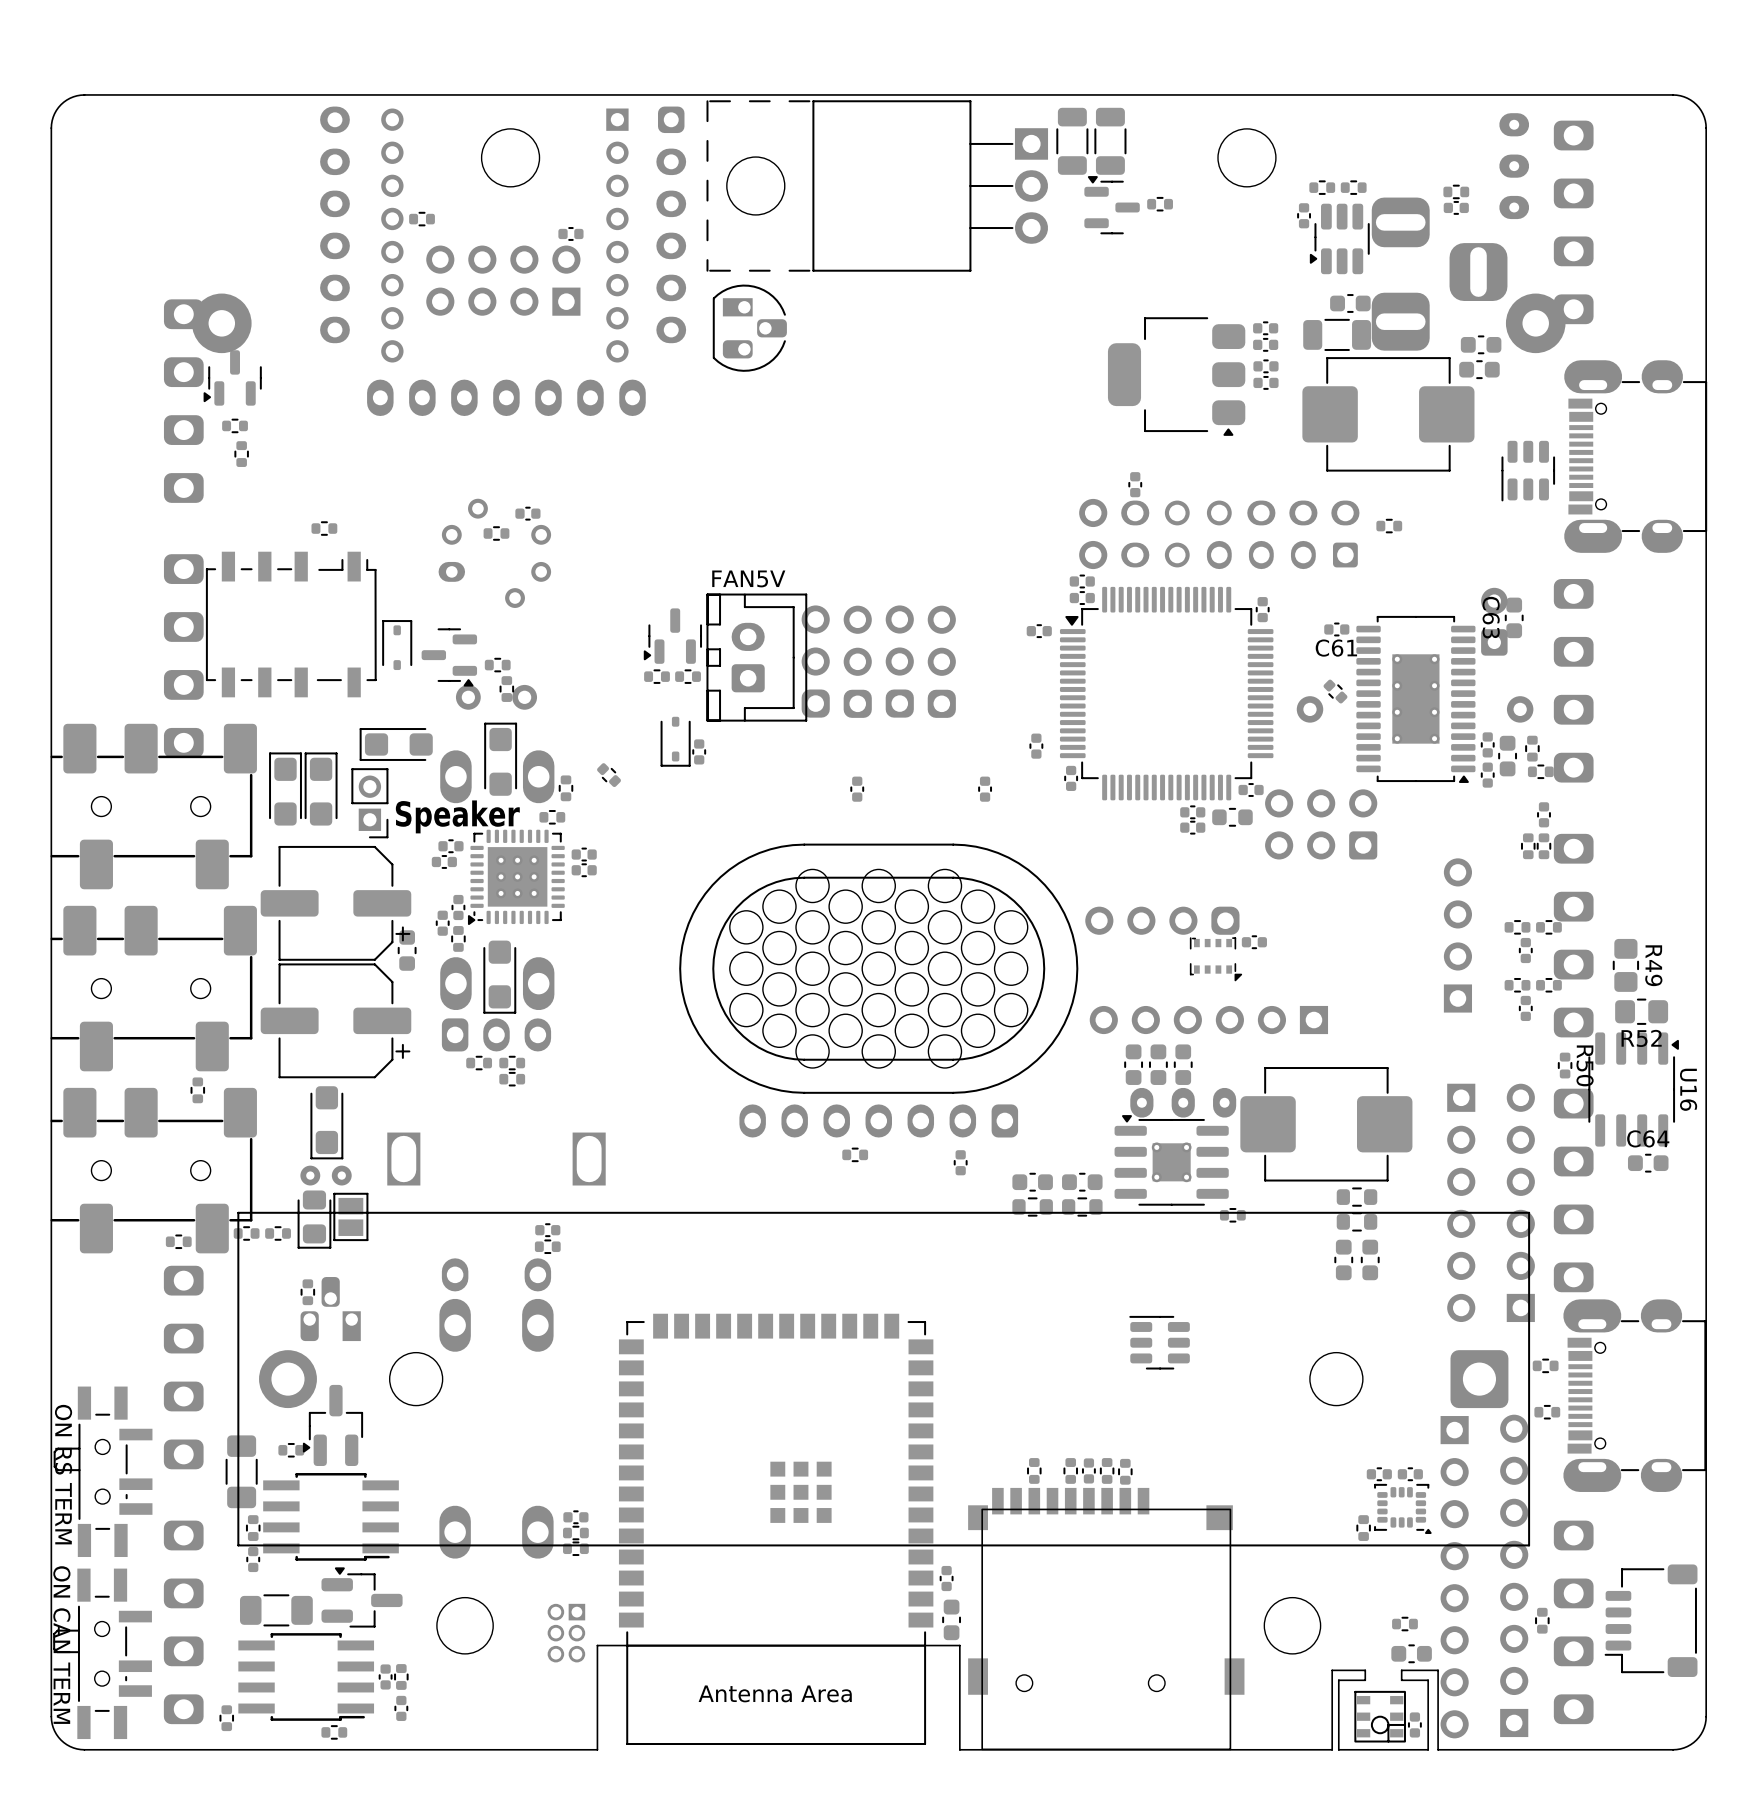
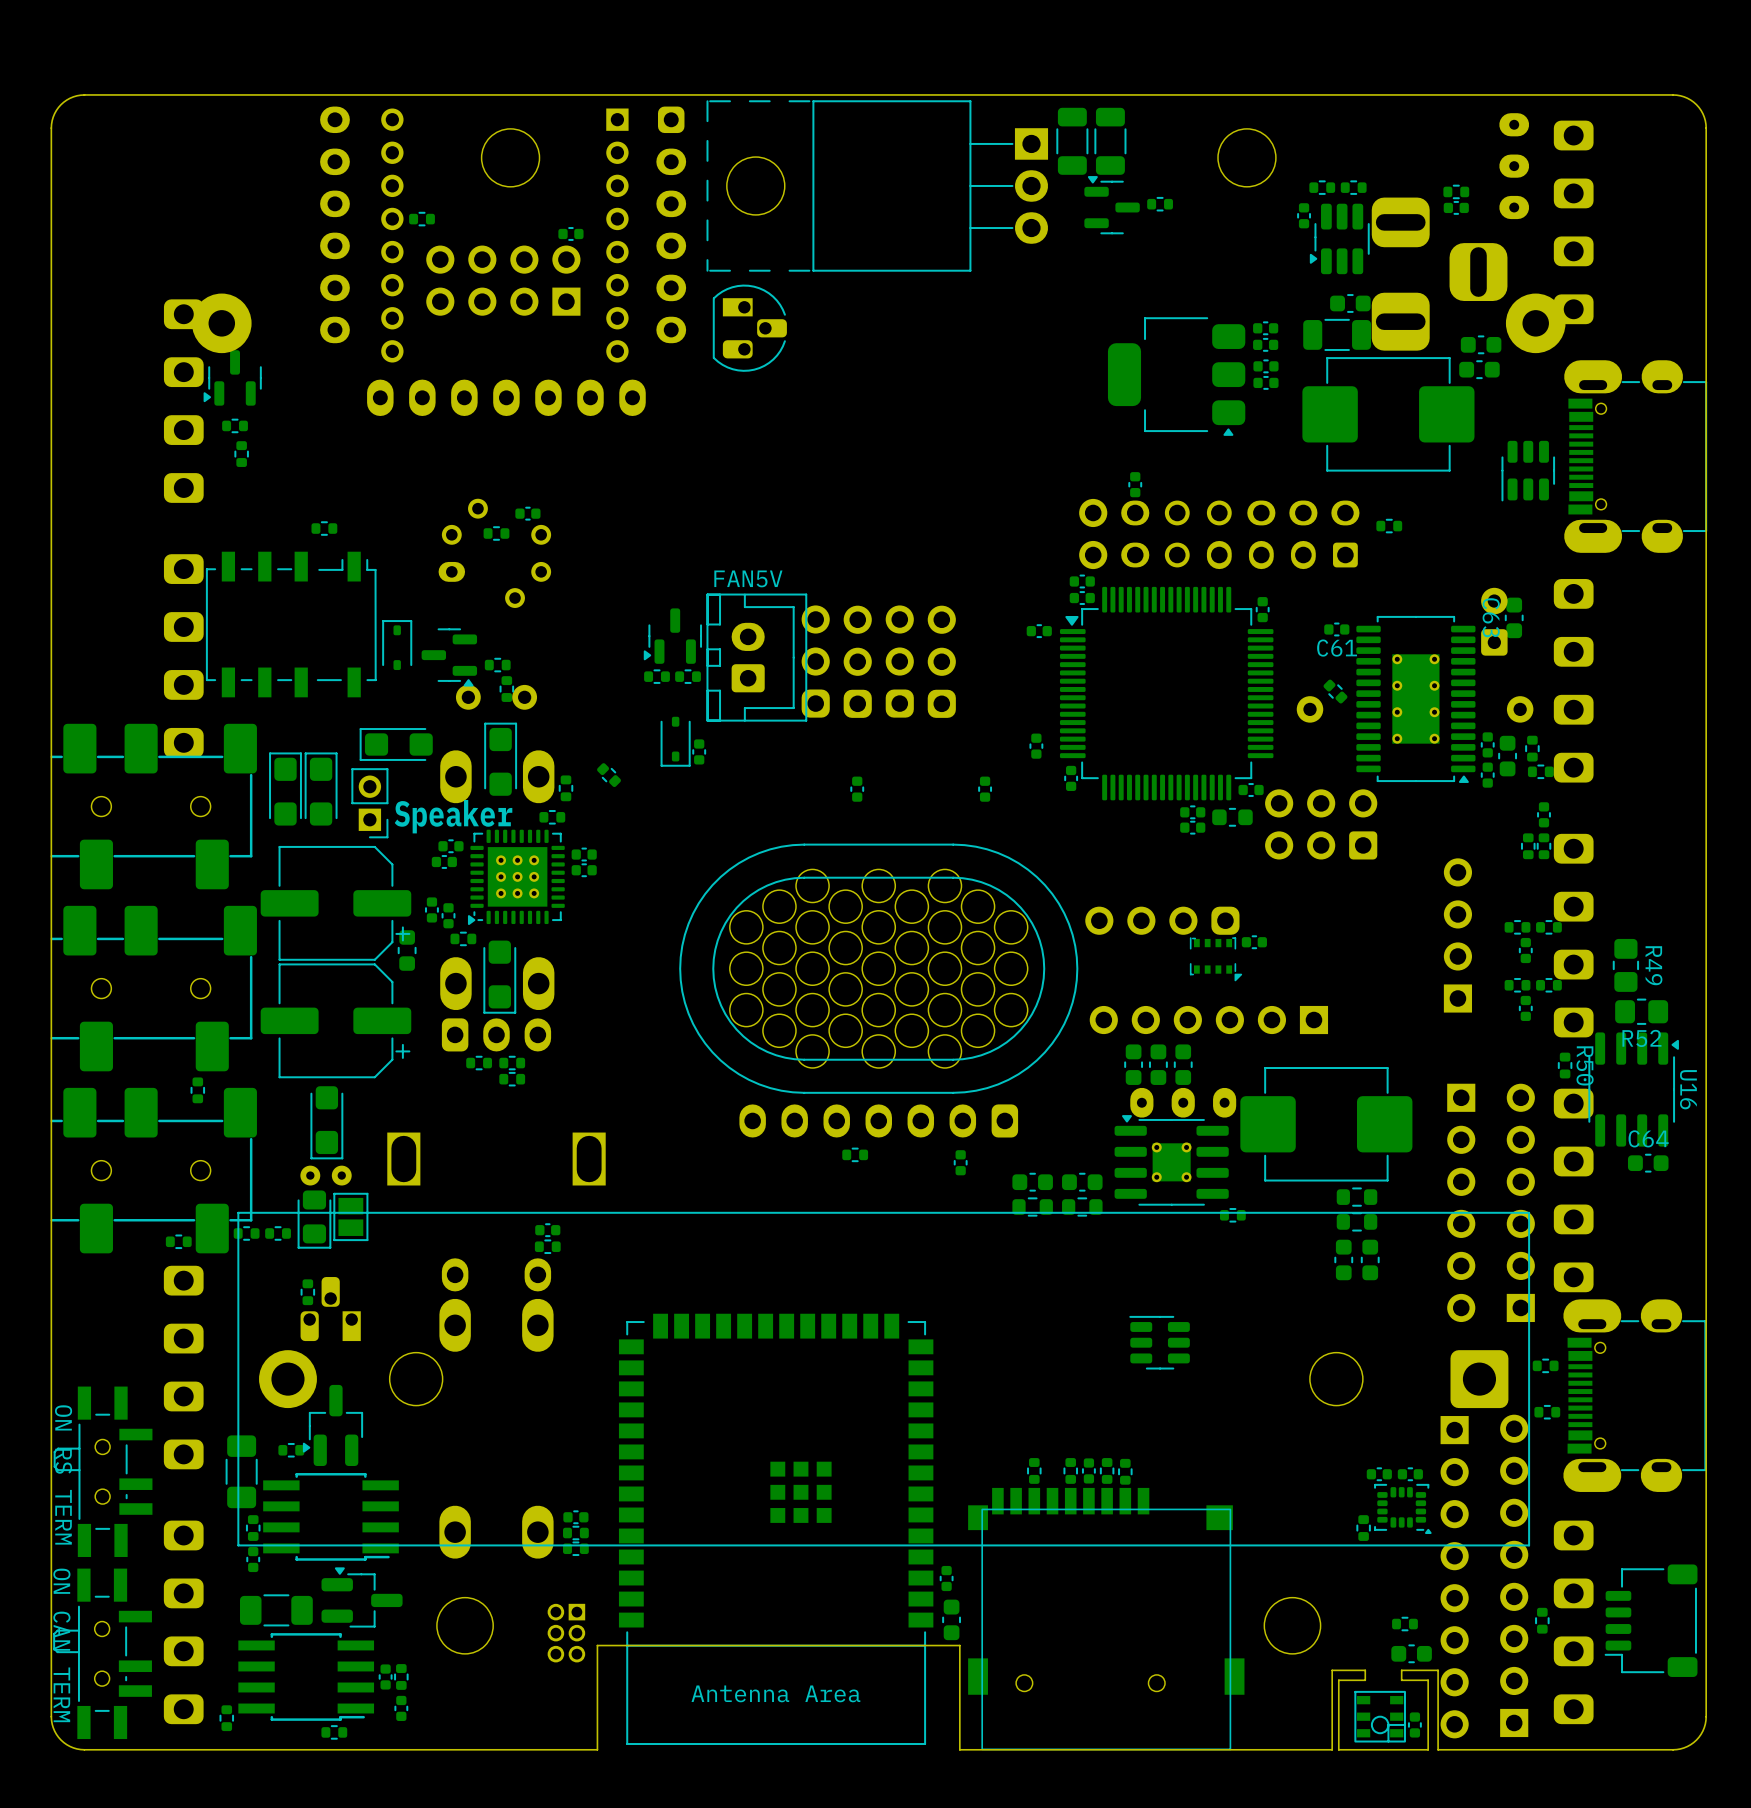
part: (458, 907) -> none
part: none -> (431, 909)
part: none -> (448, 915)
part: (442, 923) -> none
part rotation: 0° (458, 938) -> 90° clockwise (463, 938)

